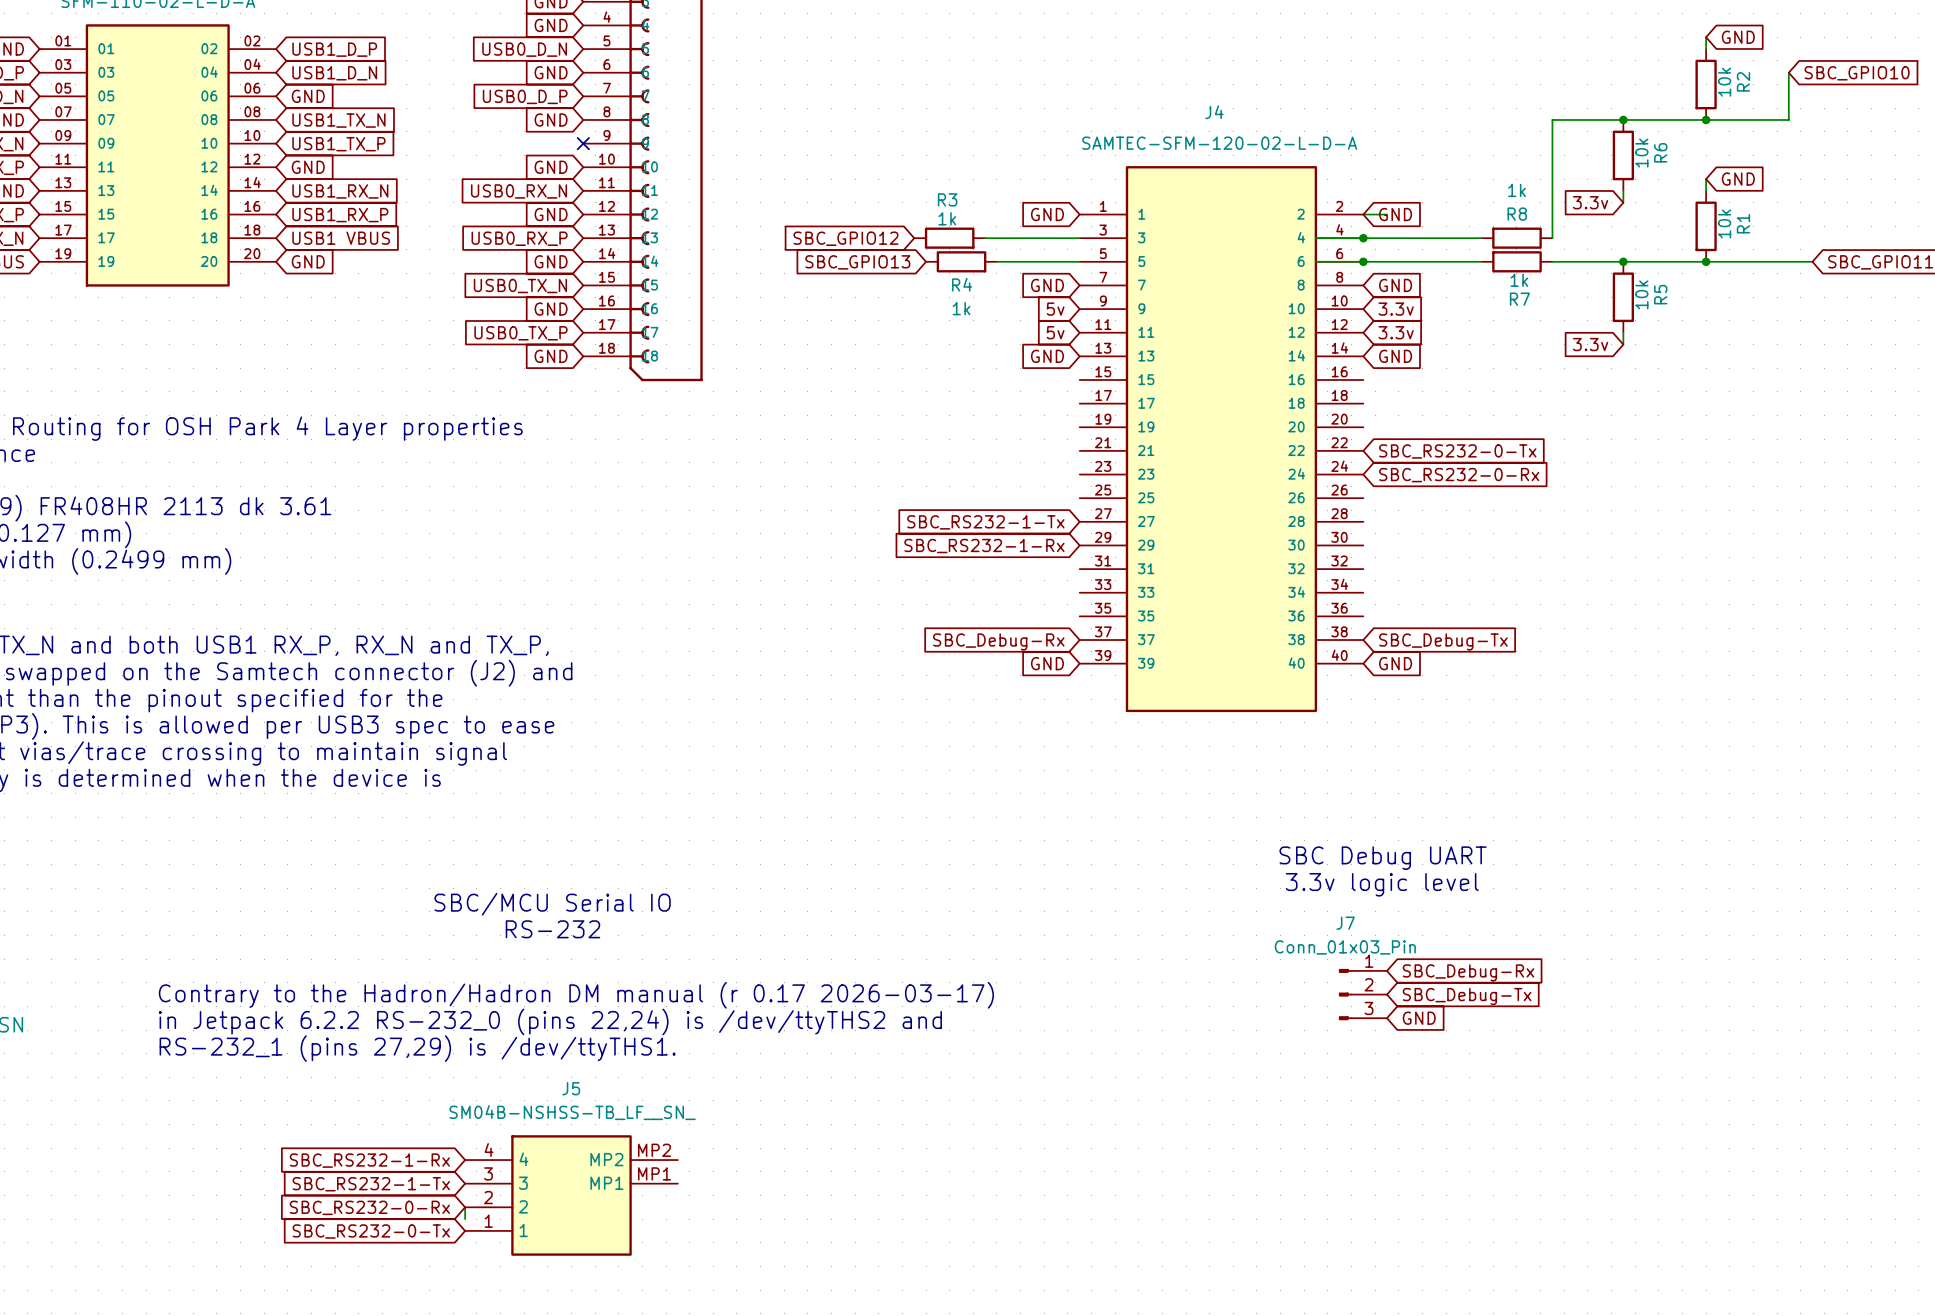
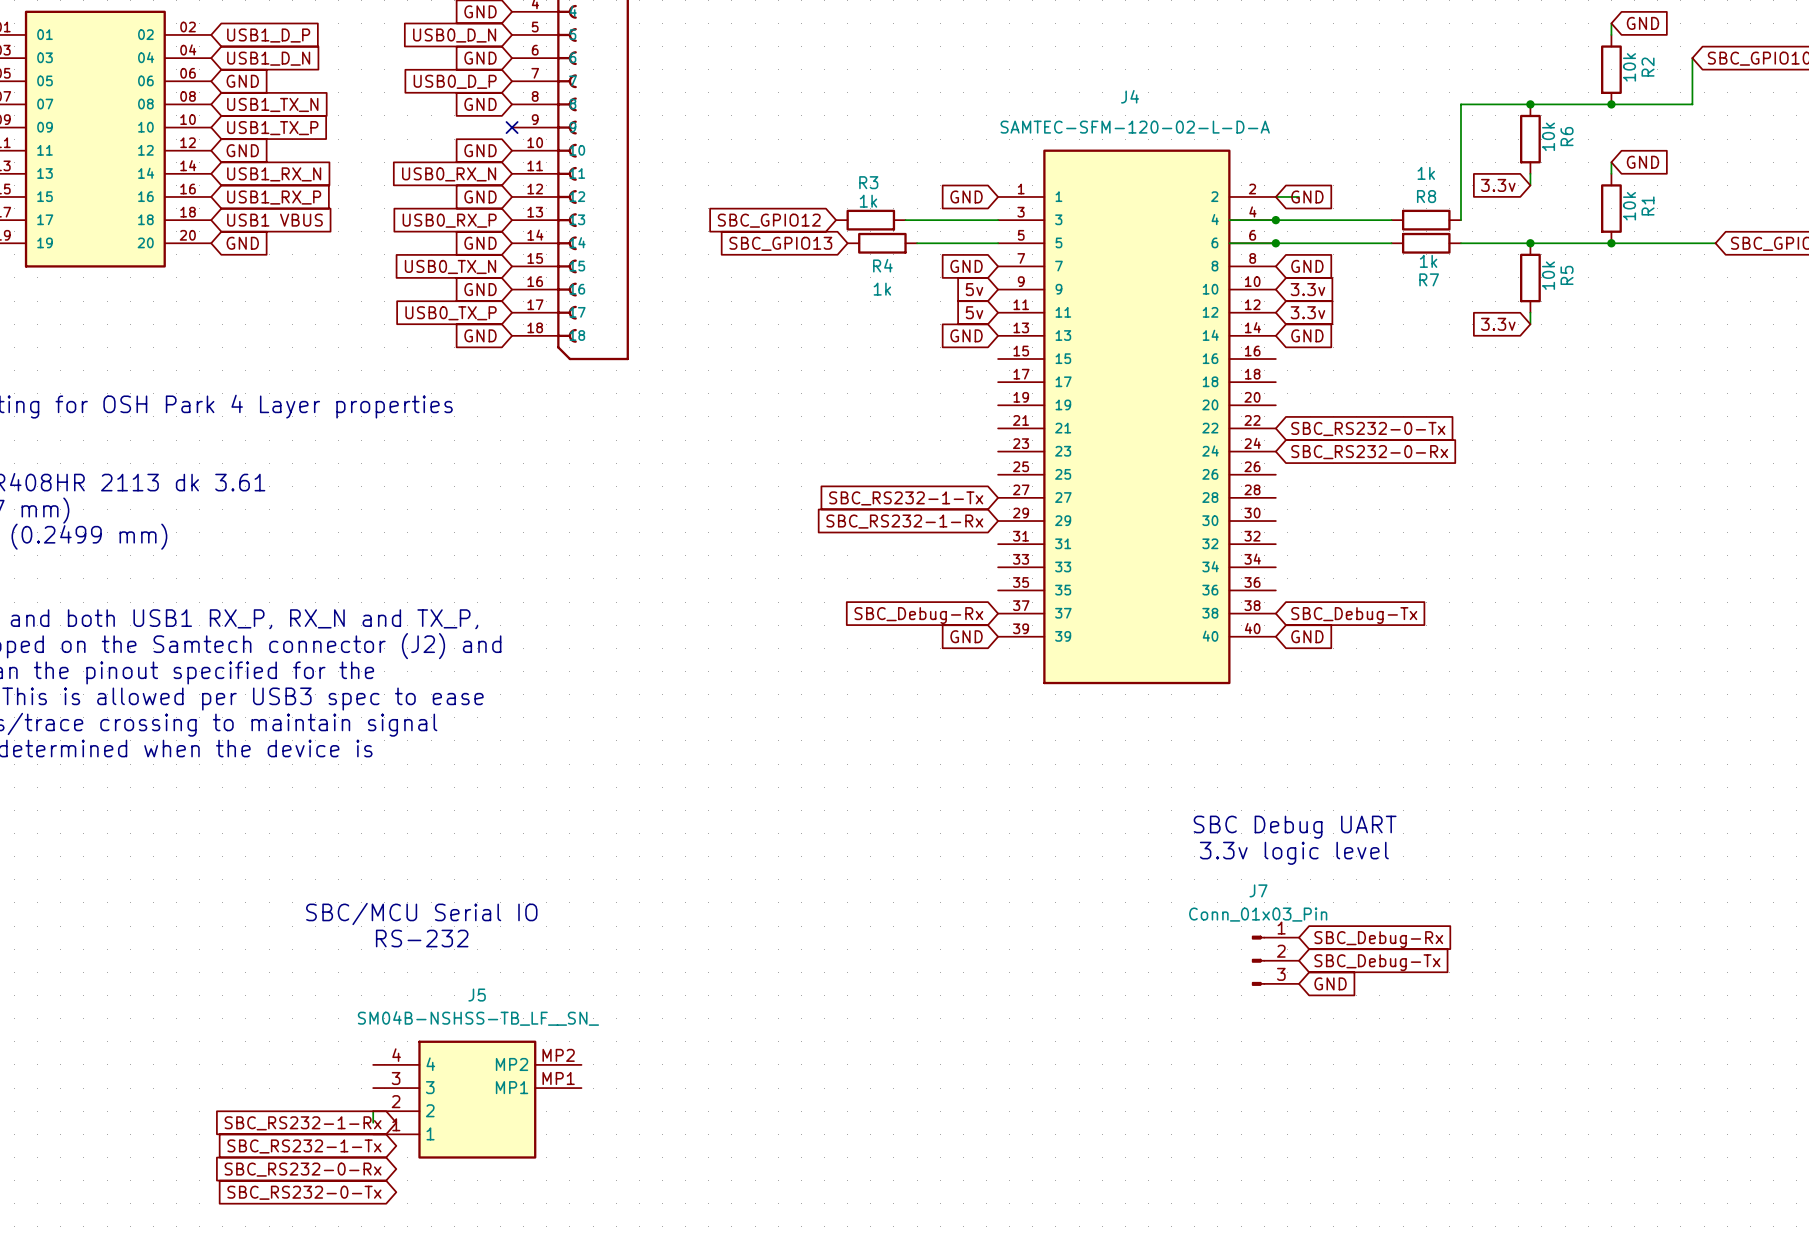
text position: SBC/MCU Serial IO (552, 904) -> SBC/MCU Serial IO (421, 913)
text position: RS-232 (552, 929) -> RS-232 (422, 938)
text: Contrary to the Hadron/Hadron DM manual (r 0.17 2026-03-17) (576, 995) -> none
text: in Jetpack 6.2.2 RS-232_0 (pins 22,24) is /dev/ttyTHS2 and (550, 1021) -> none
text: RS-232_1 (pins 27,29) is /dev/ttyTHS1. (417, 1048) -> none
J5 position: (571, 1195) -> (477, 1099)
wire: (465, 1207) (465, 1219) -> (373, 1111) (373, 1122)

